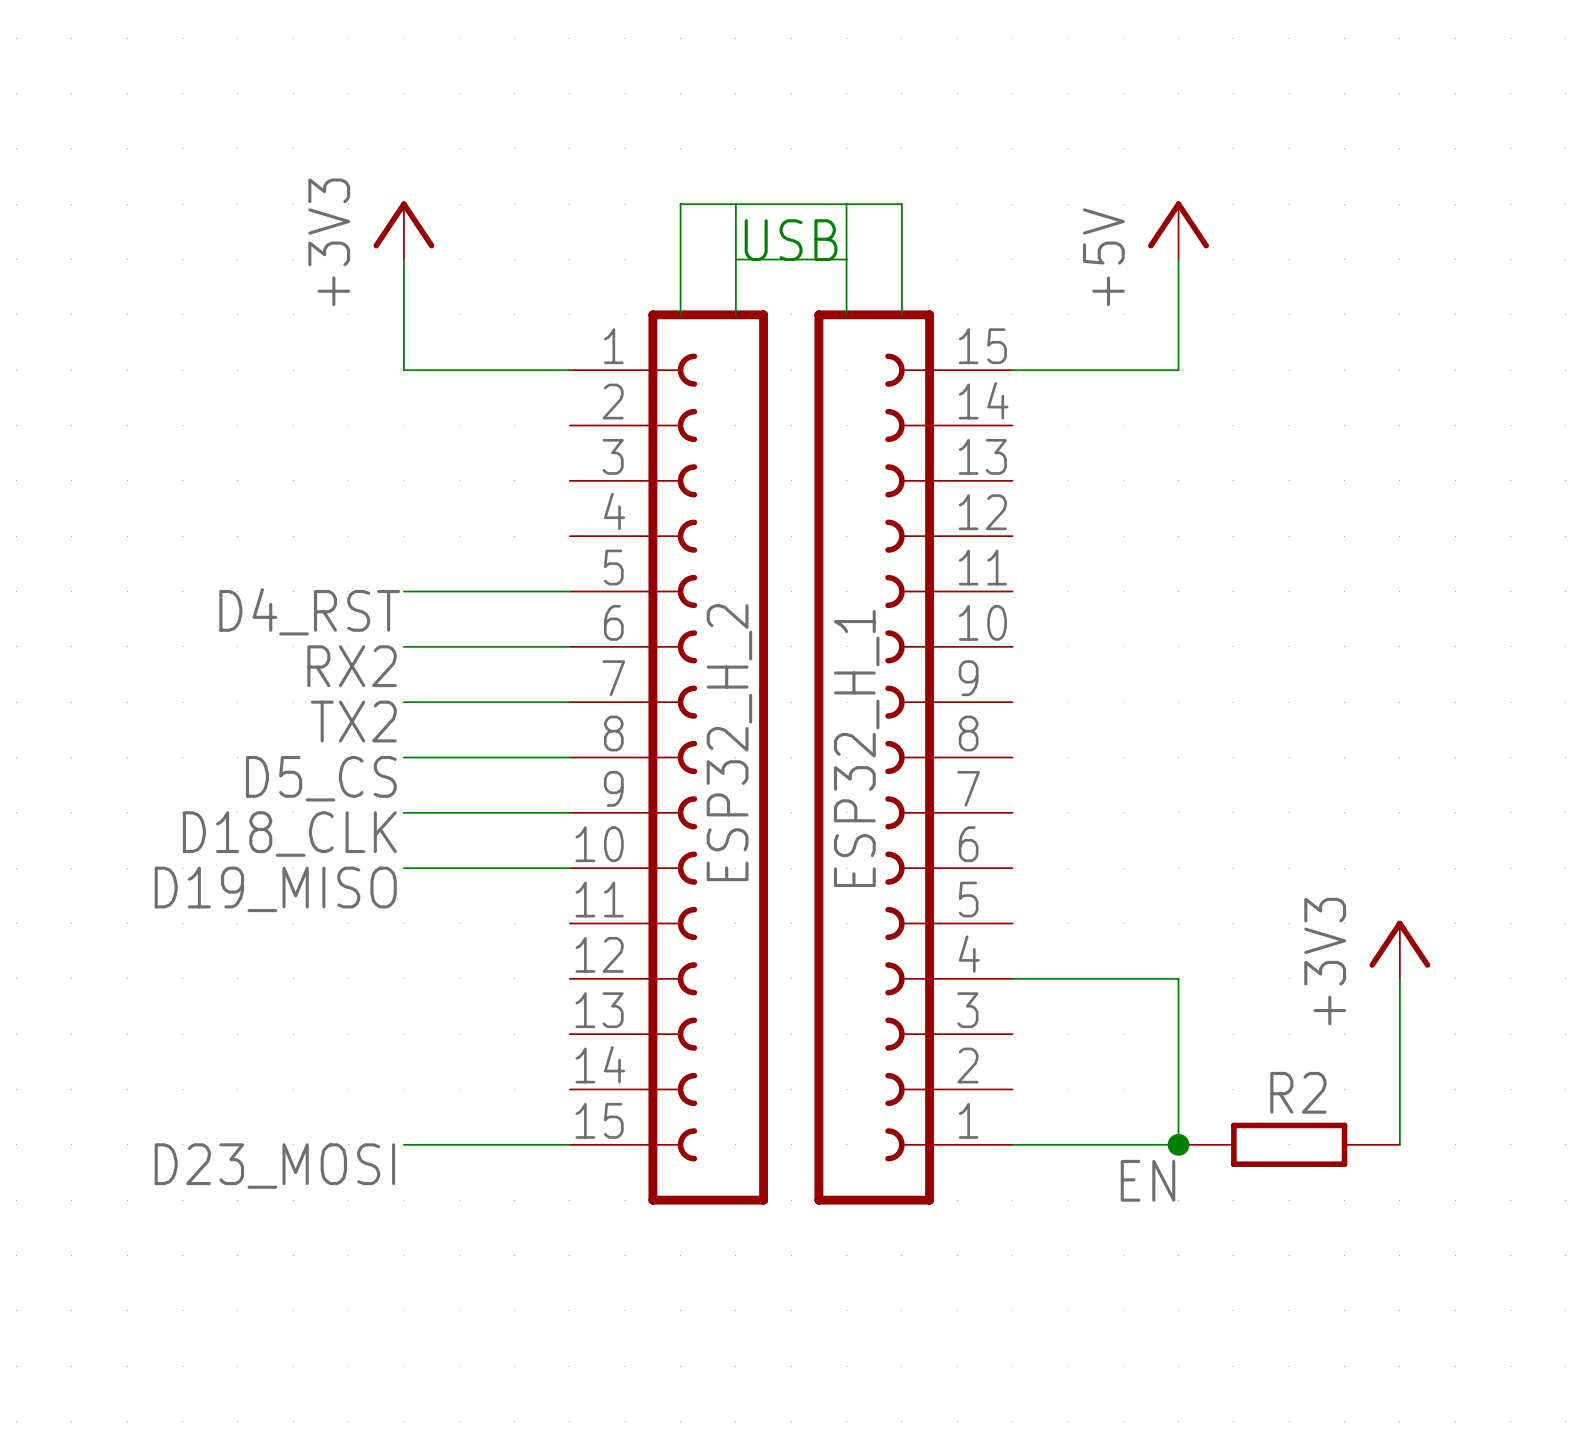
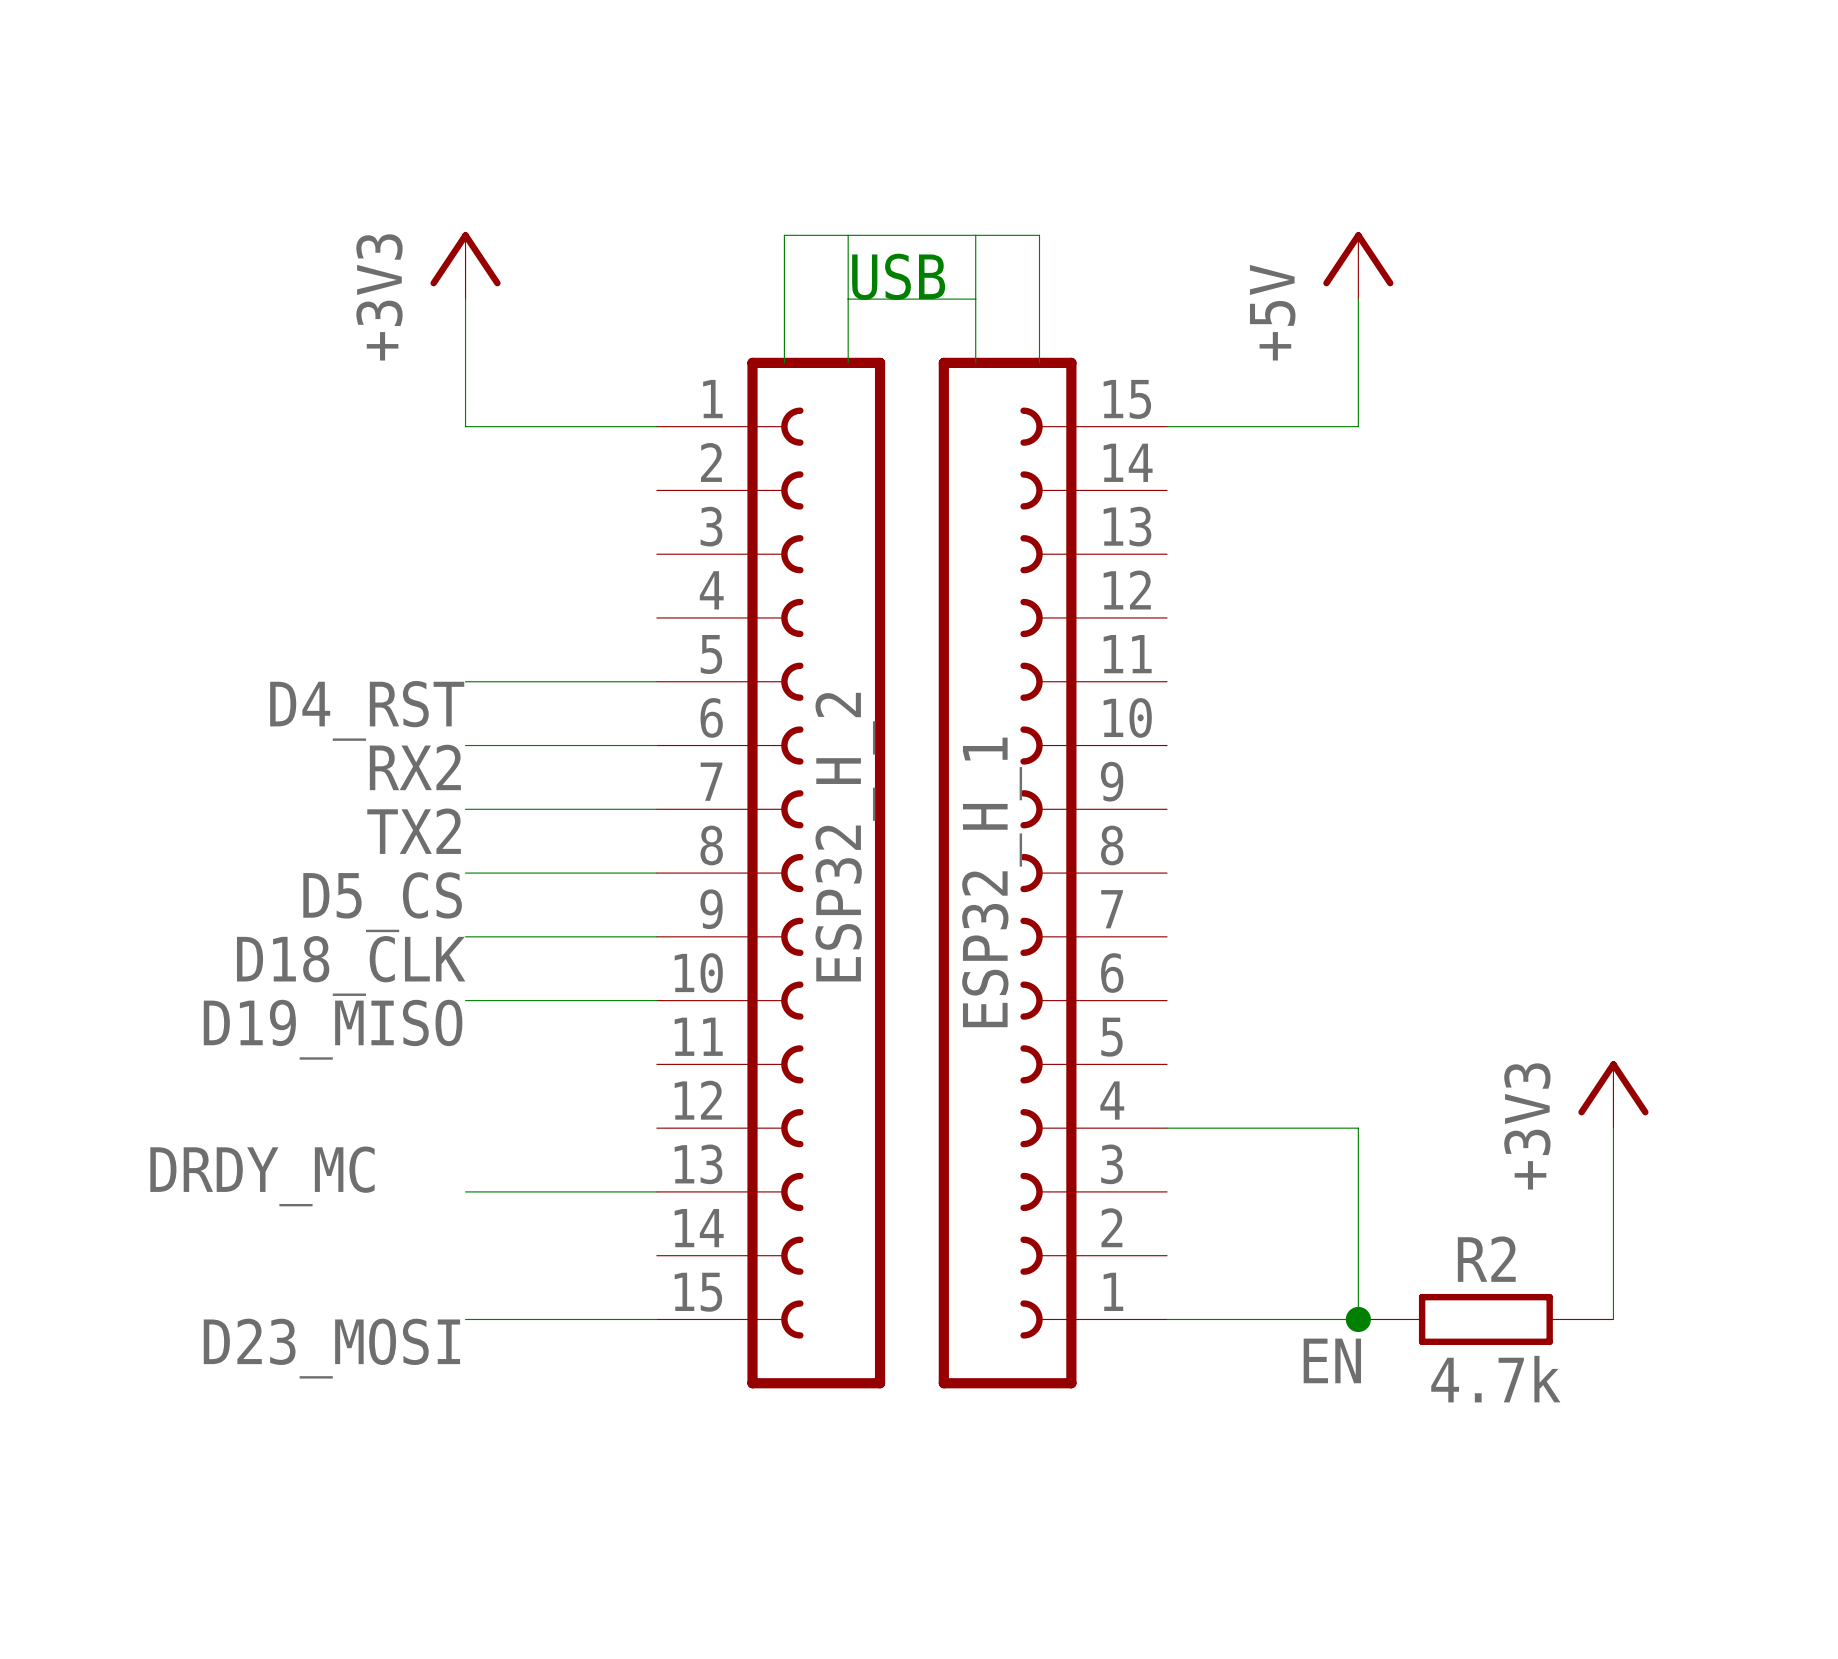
label: none -> DRDY_MC (262, 1176)
wire: none -> (465, 1191) (656, 1191)
R2 value: none -> 4.7k (1495, 1379)

